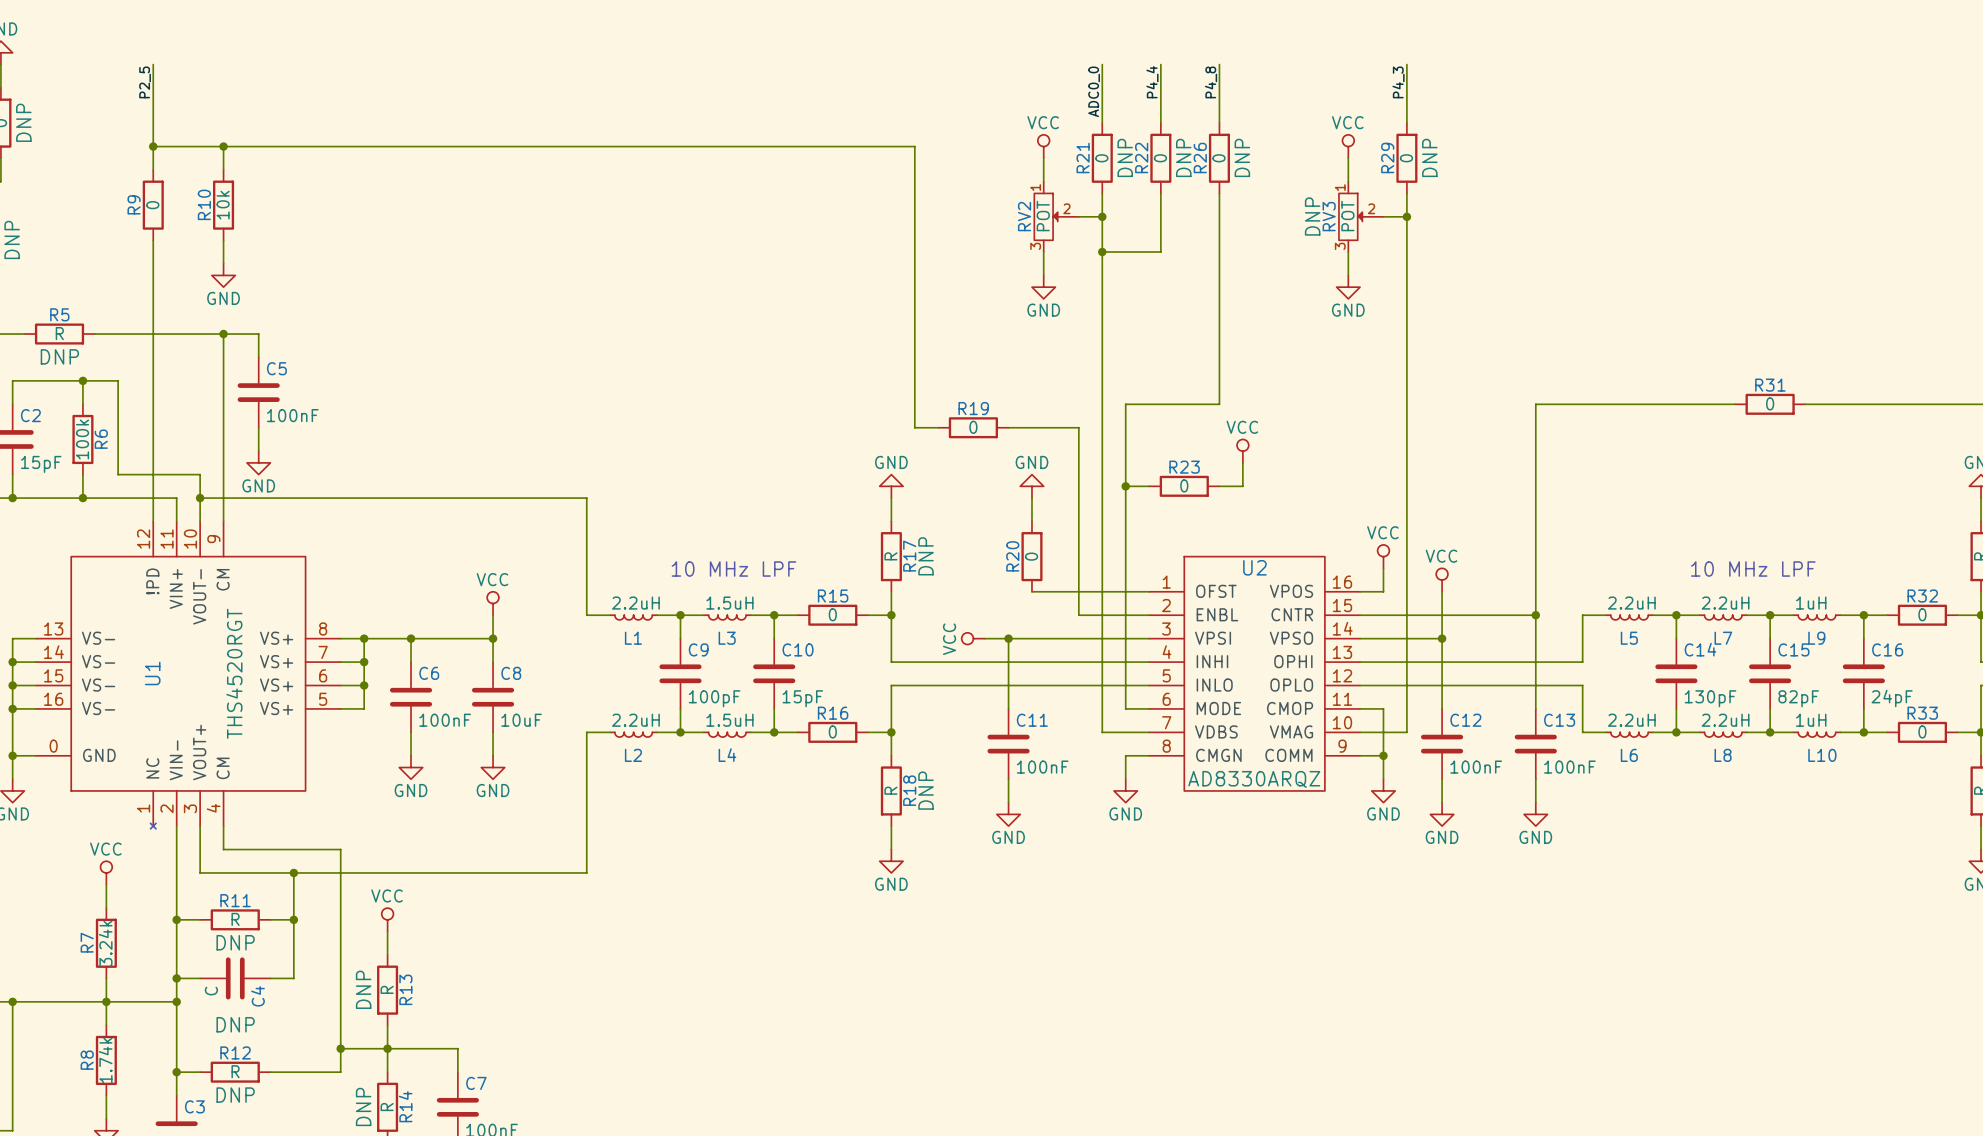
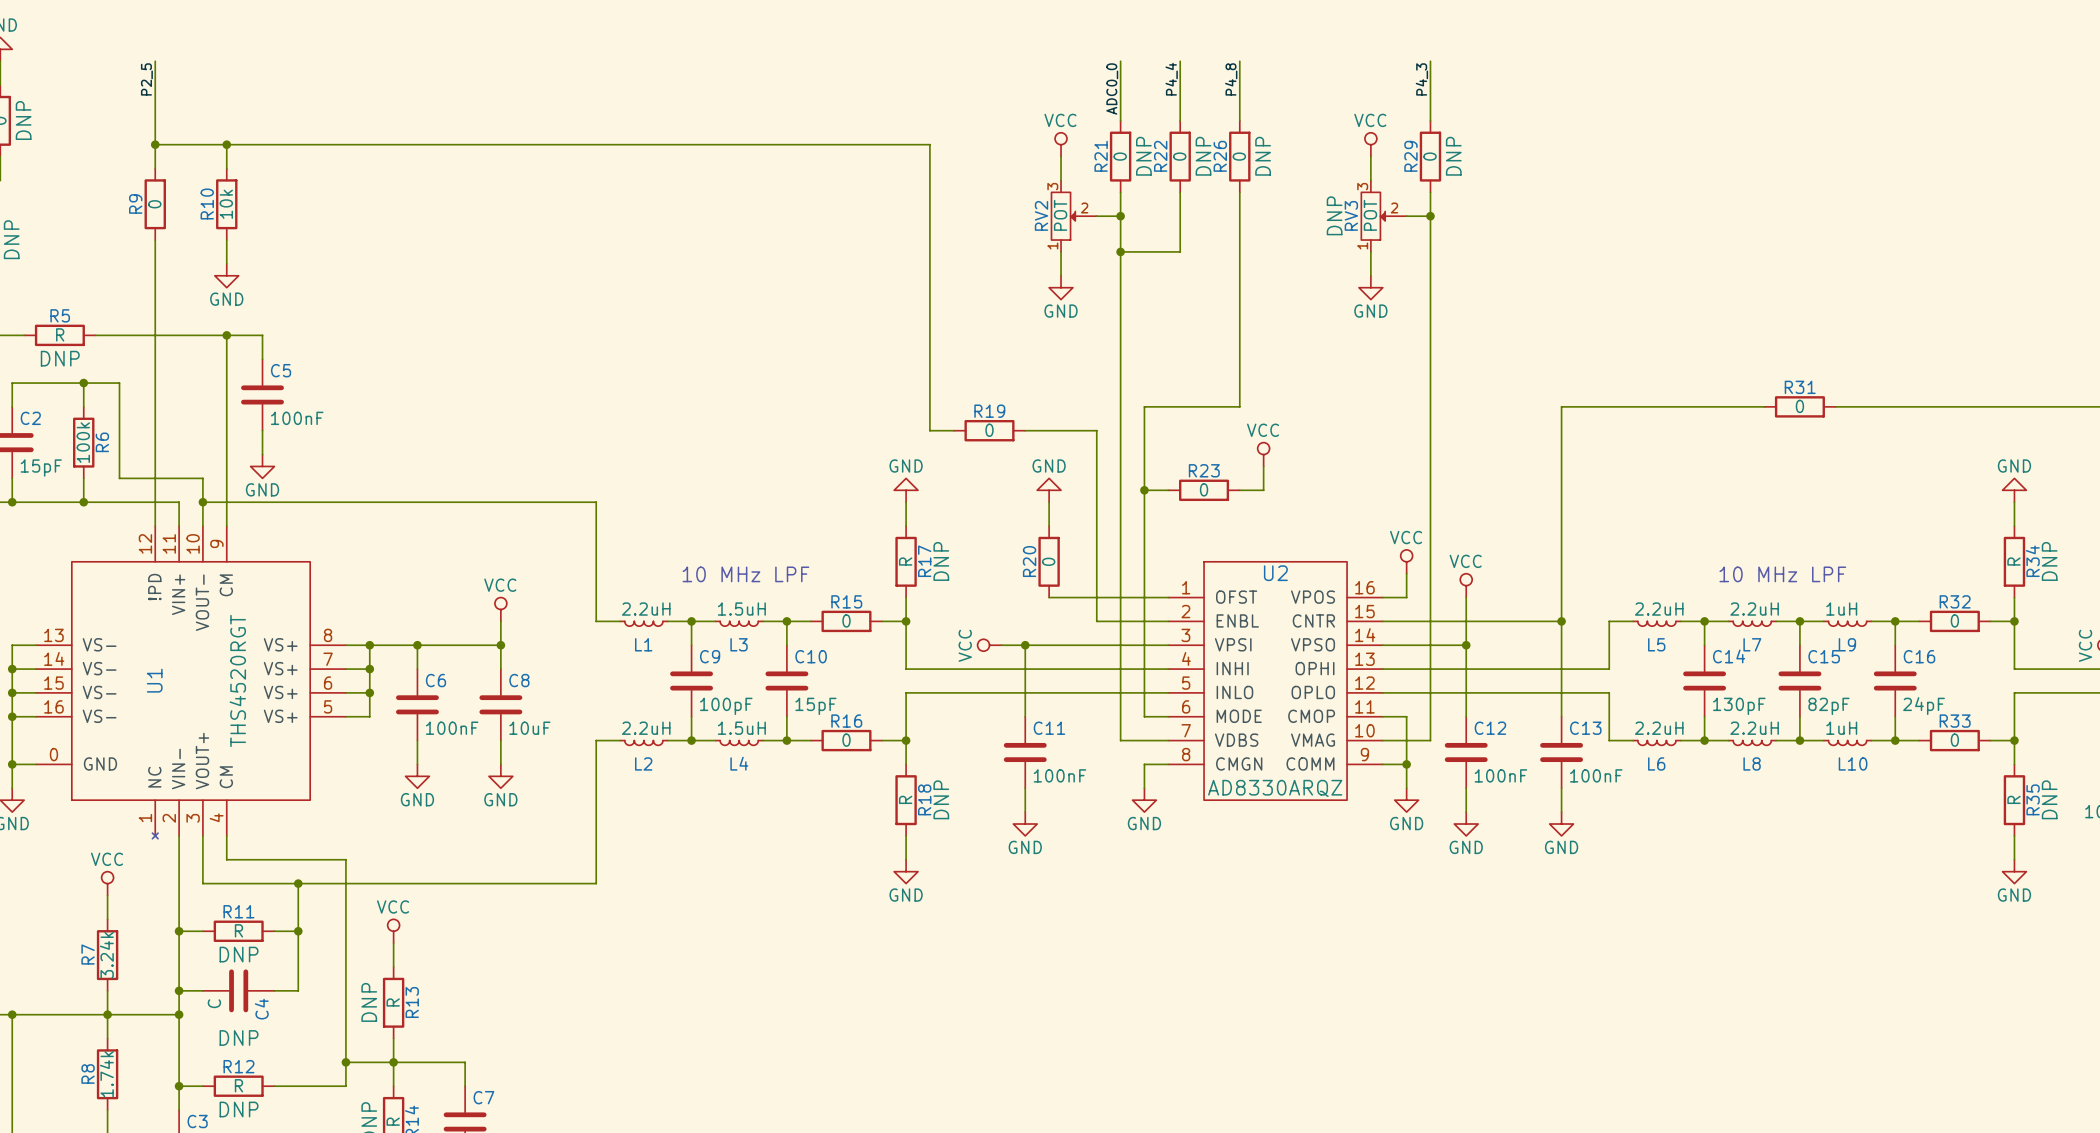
RV2 flip: as is (1046, 216) -> up-down (1063, 216)
RV3 flip: as is (1350, 216) -> up-down (1373, 216)

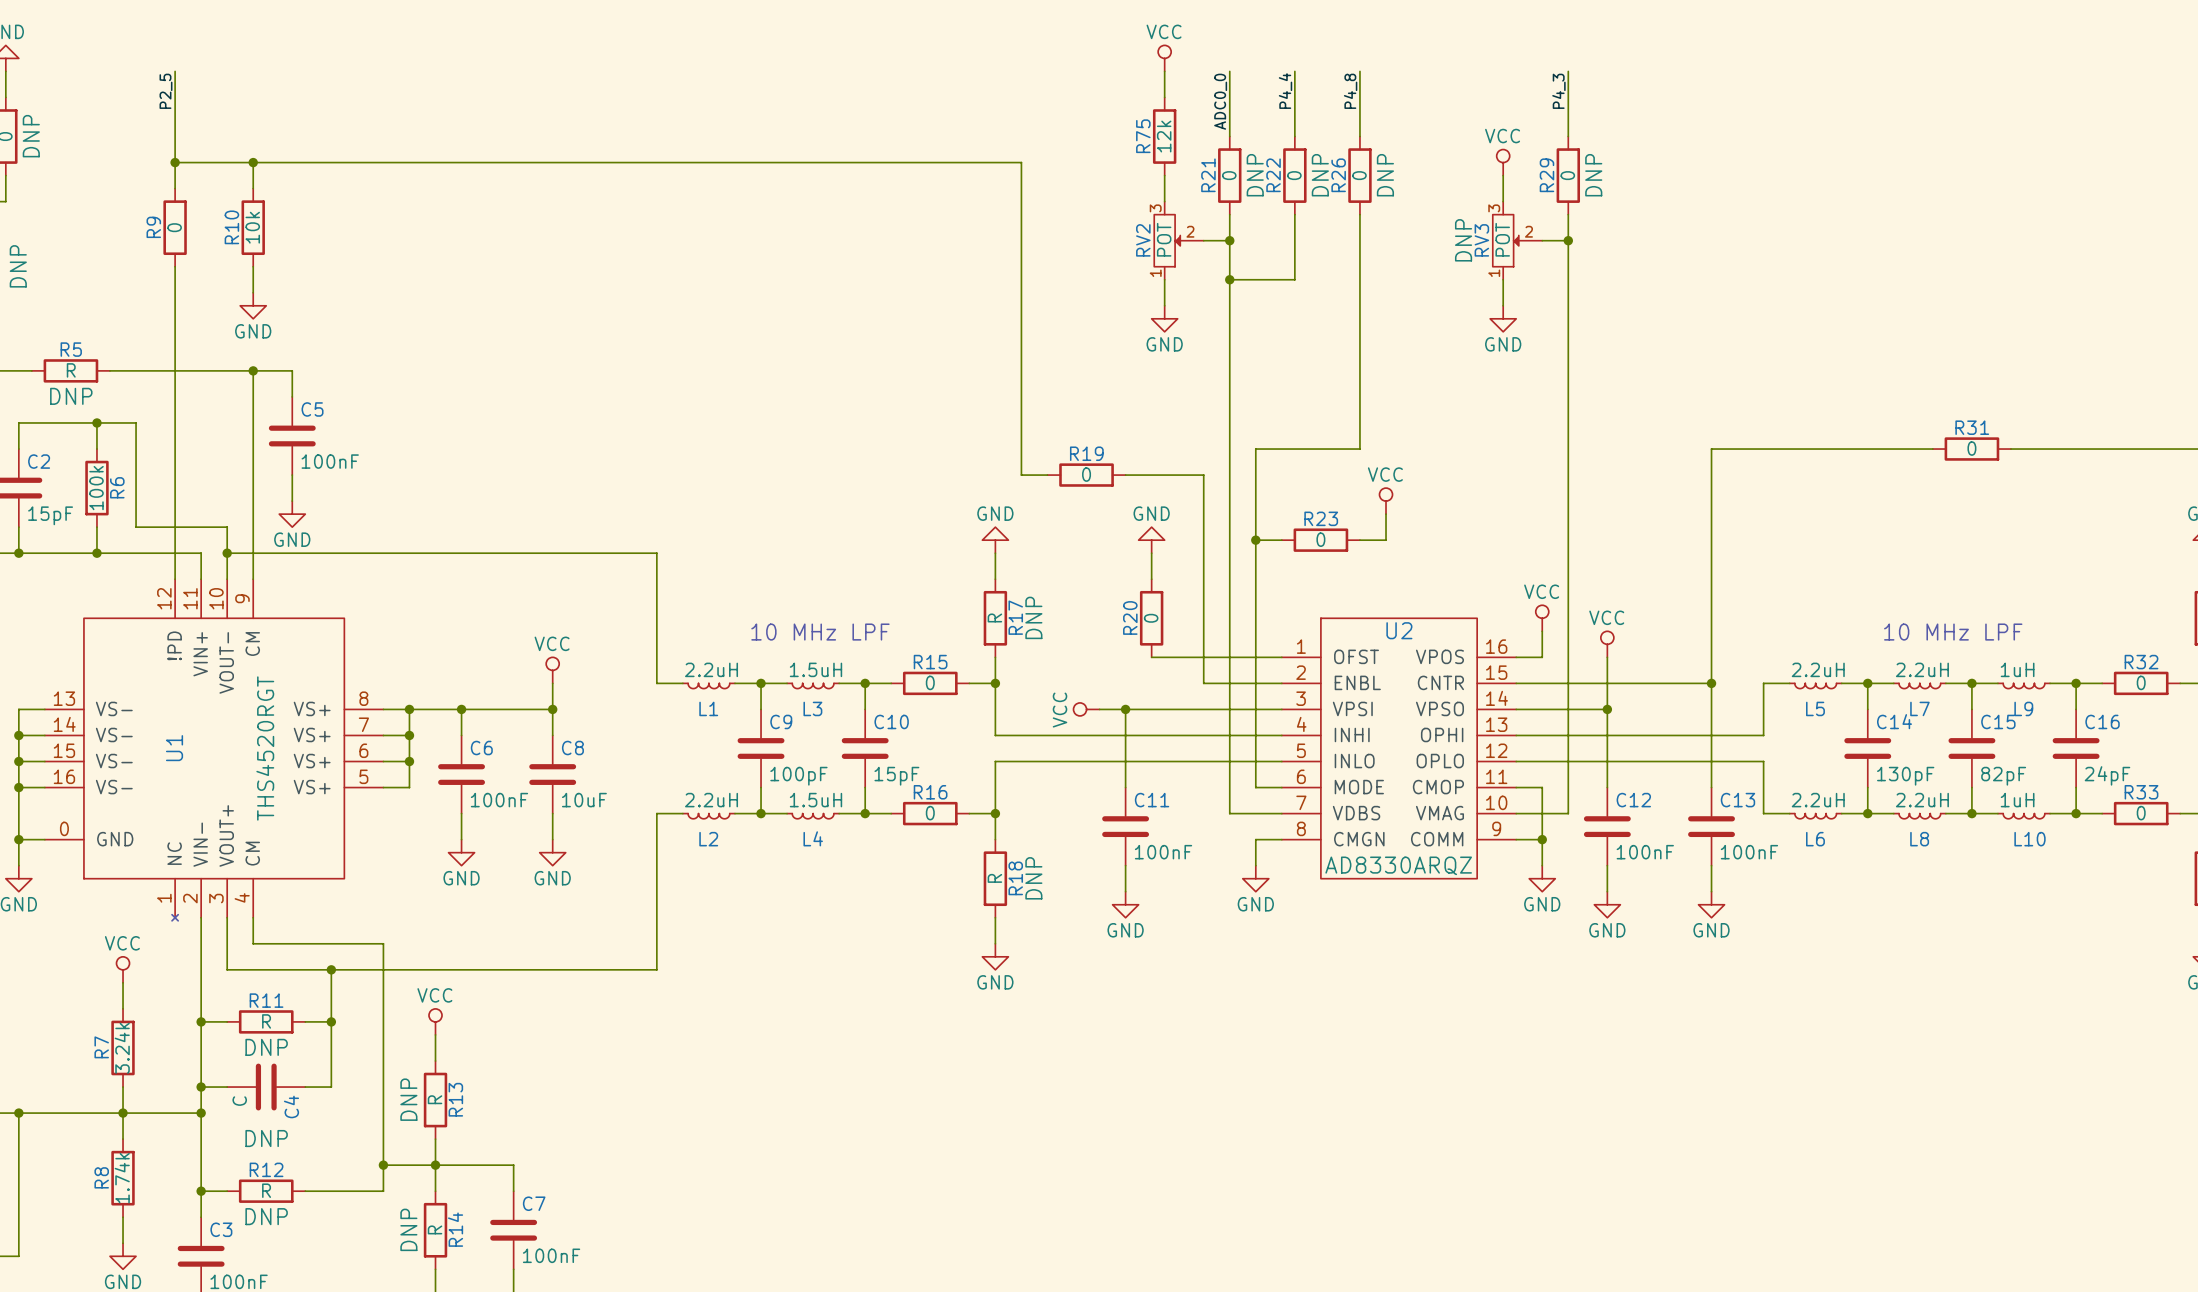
wire: none -> (1164, 71) (1164, 97)
R75: none -> 12k (1164, 136)
power symbol position: VCC (1061, 144) -> VCC (1164, 58)

